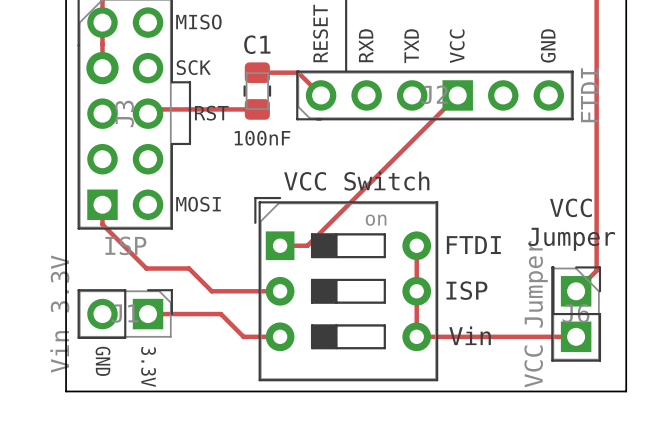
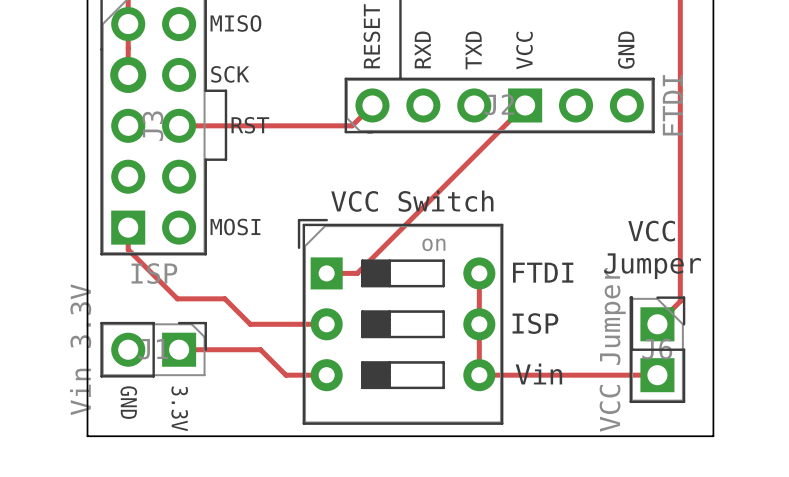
track: (257, 72) (298, 72) (321, 95) -> none
C1: 100nF (257, 91) -> none
track: (257, 109) (152, 109) (148, 113) -> (372, 105) (352, 125) (179, 125)

